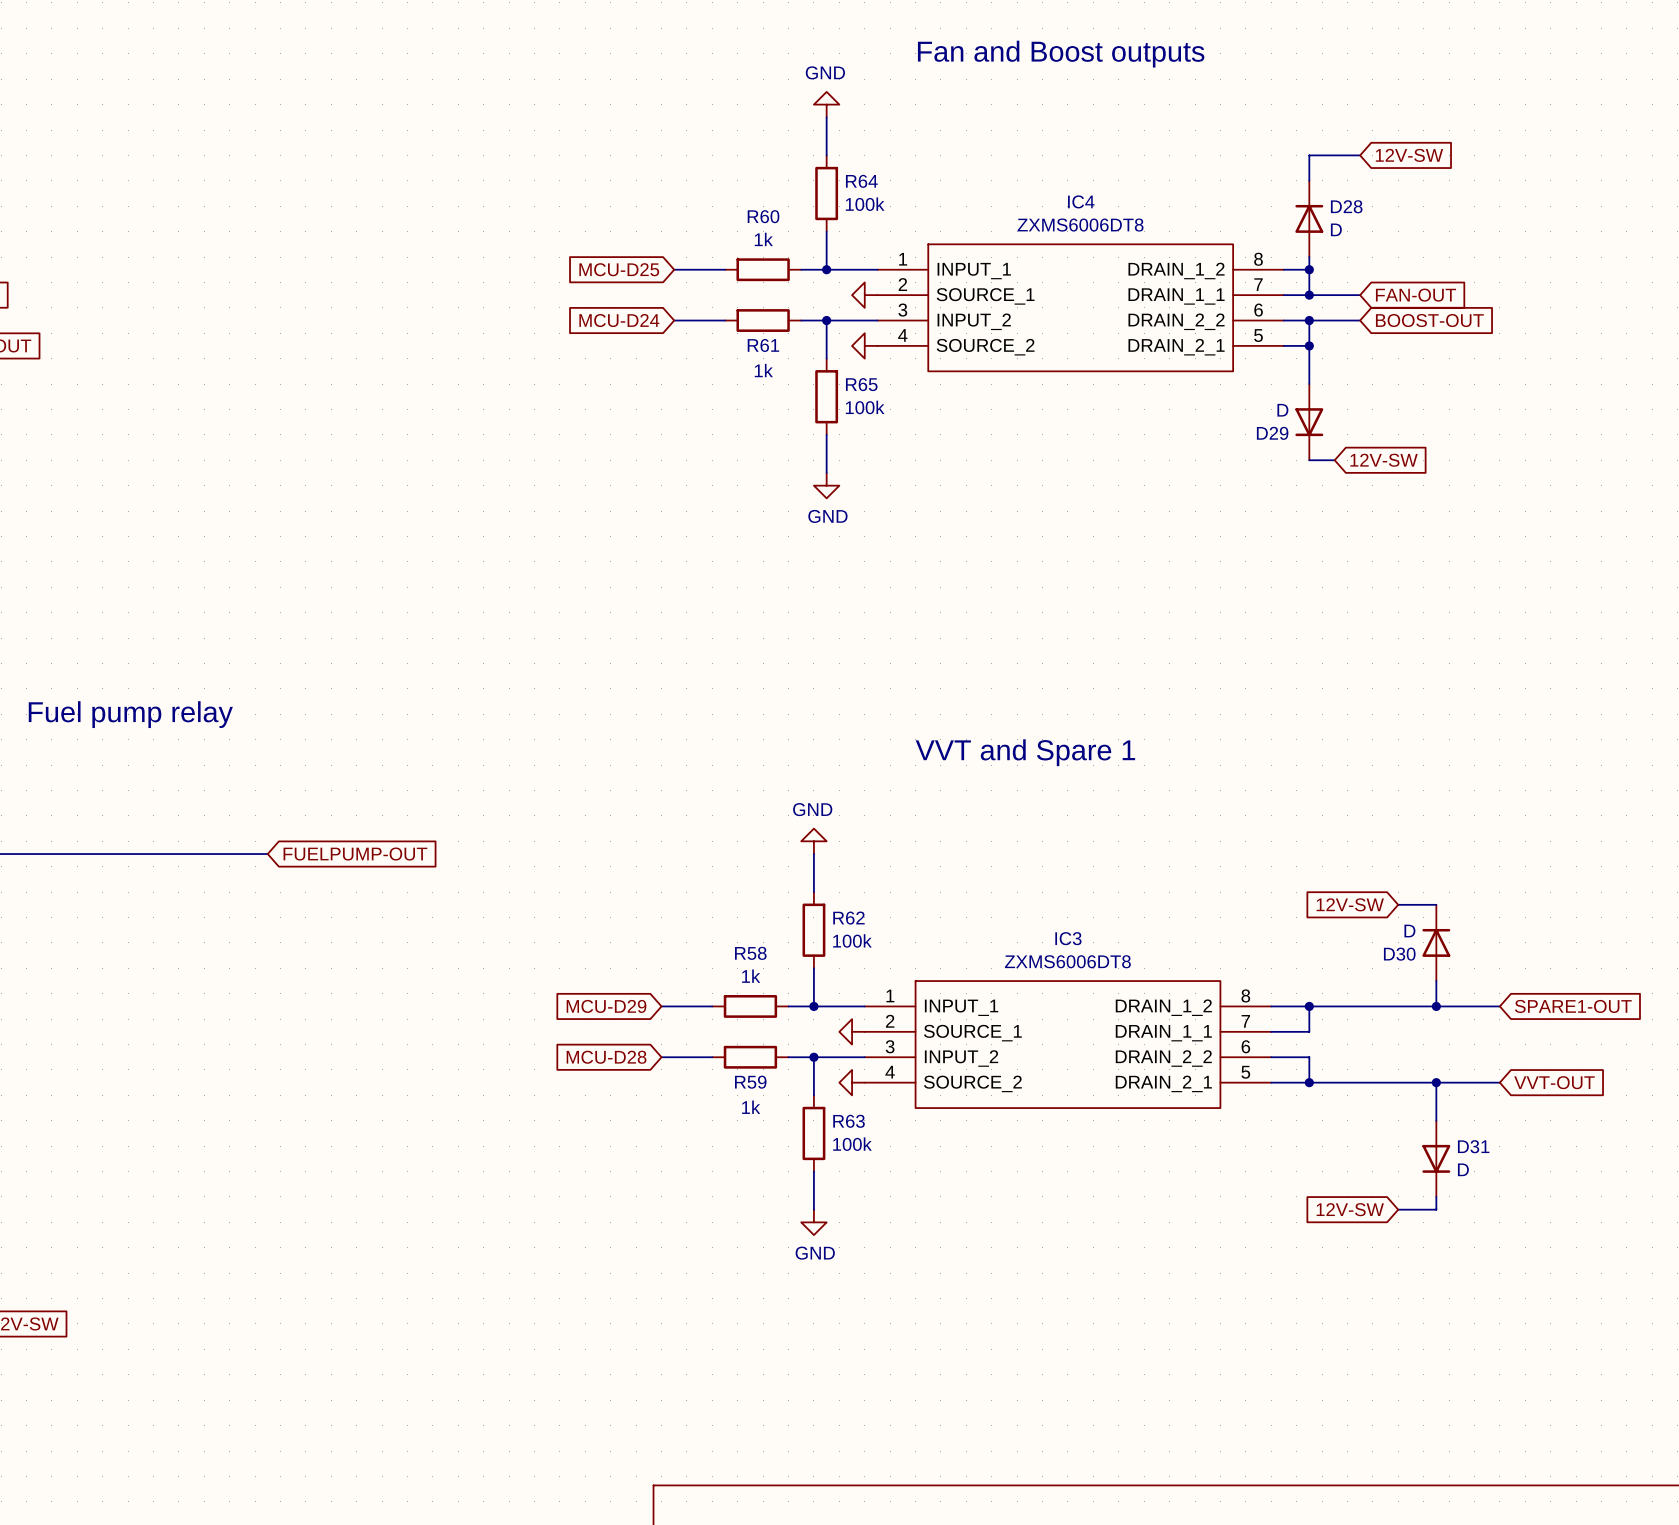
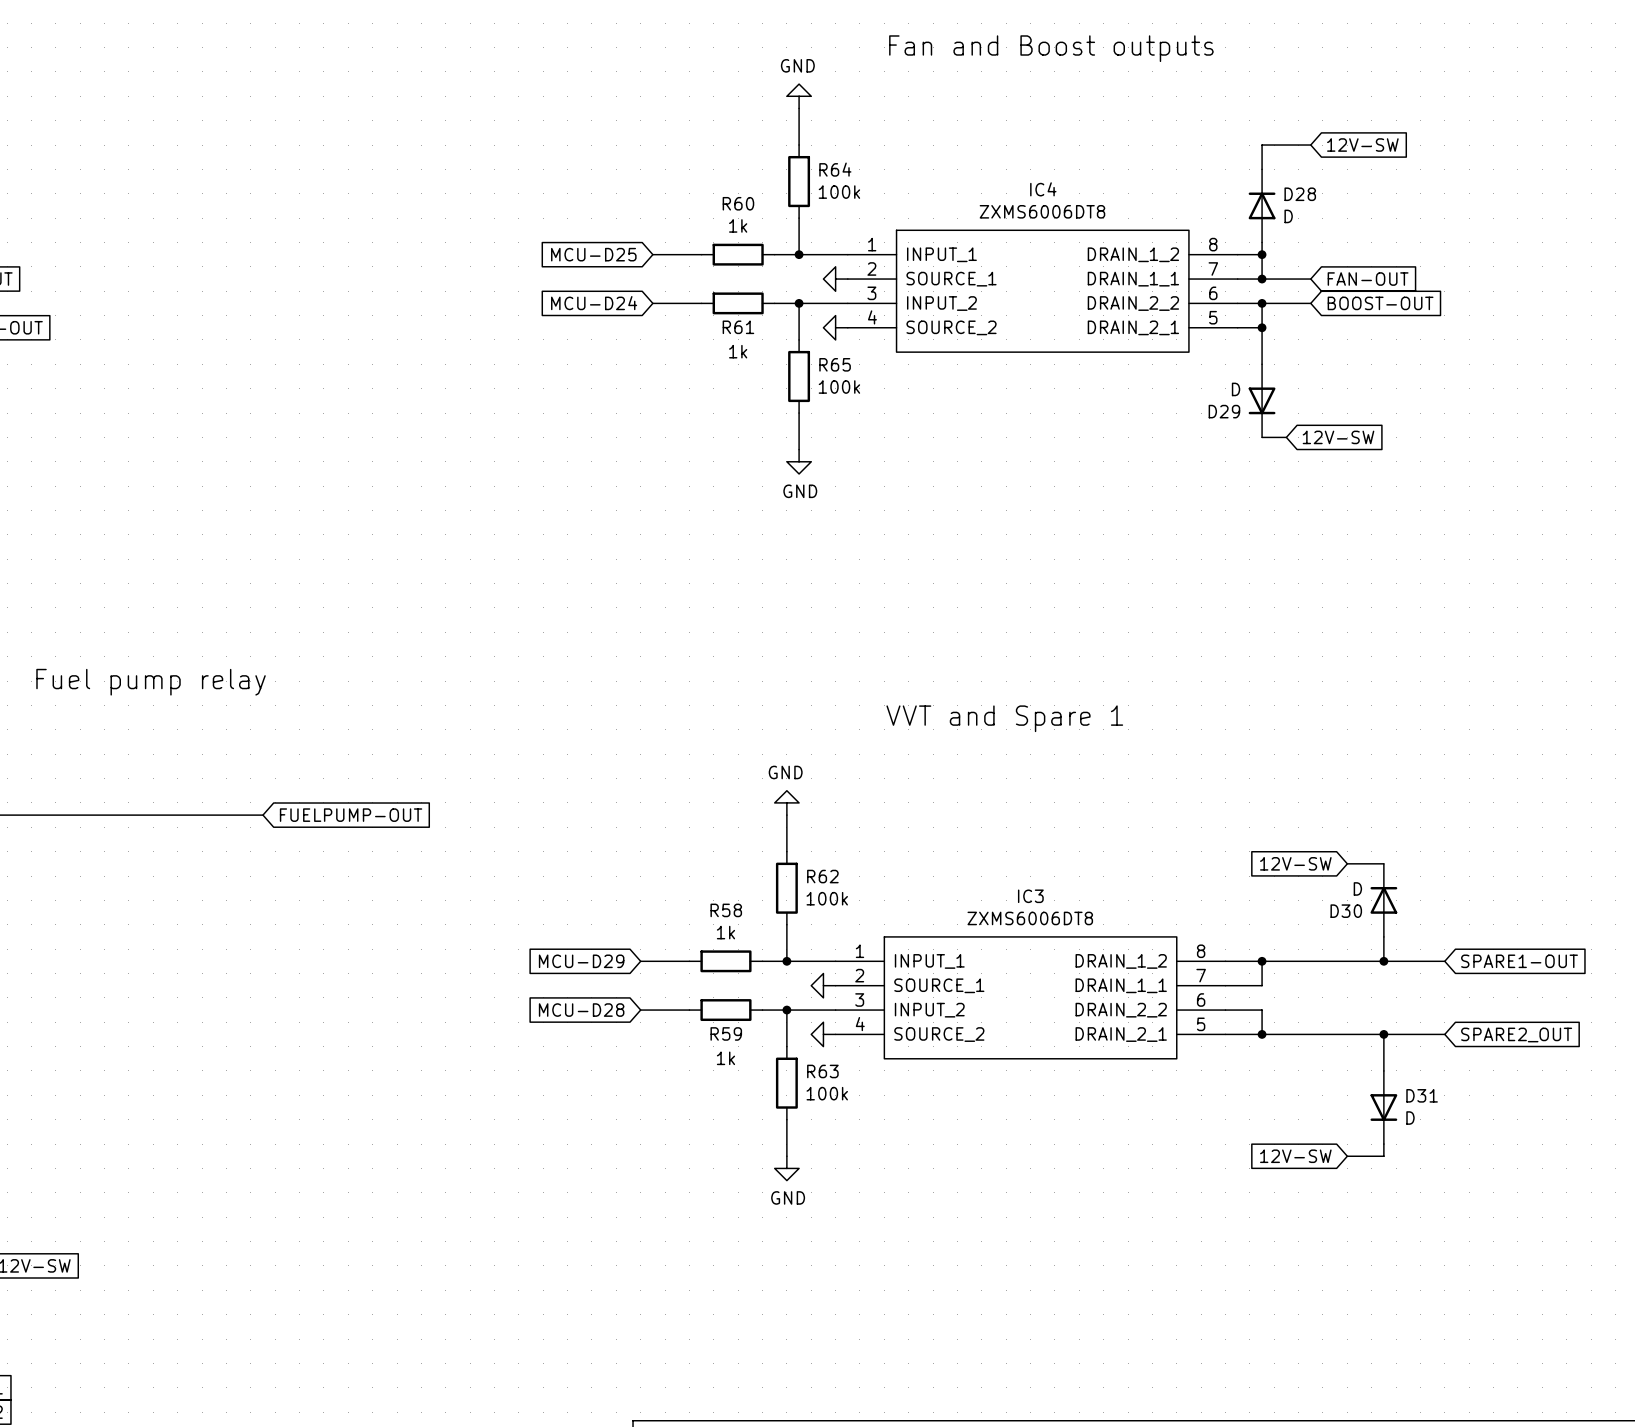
global label: VVT-OUT (1554, 1082) -> SPARE2_OUT (1516, 1034)

